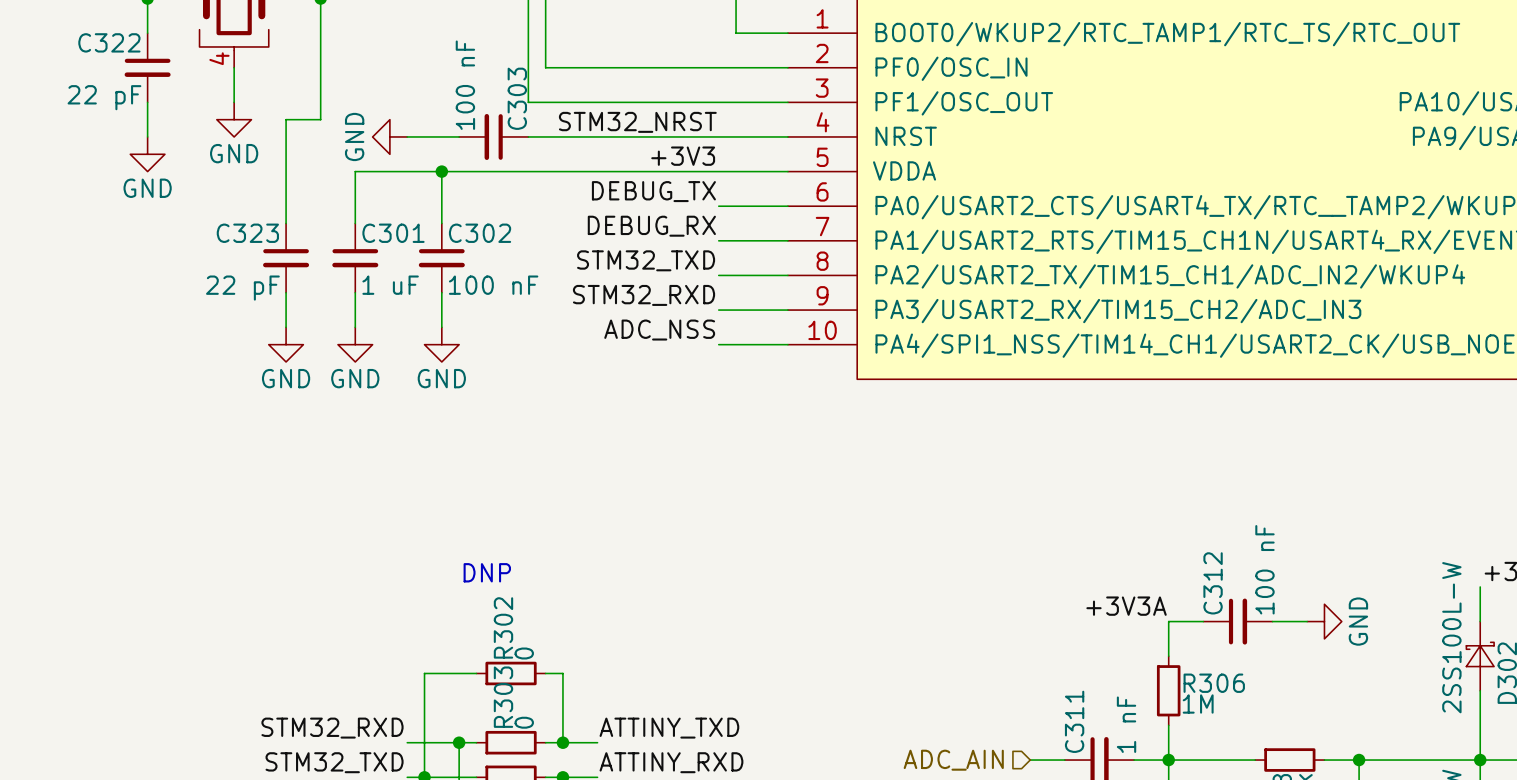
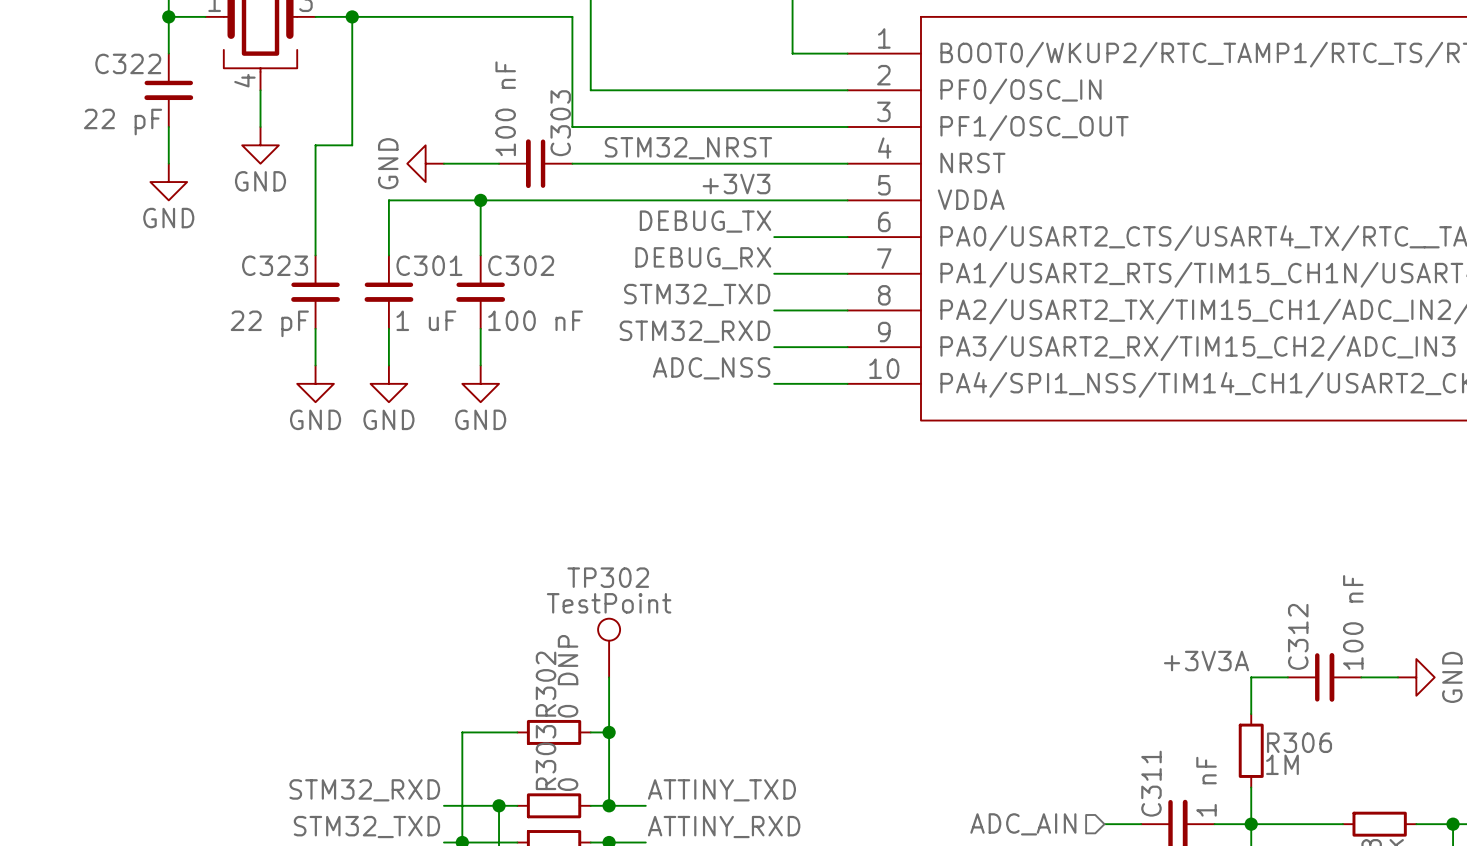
text: DNP (487, 572) -> none
TP302: none -> TestPoint (609, 648)
wire: none -> (609, 677) (609, 732)
R302 value: 0 (524, 653) -> 0 DNP (568, 676)
junction: none -> (609, 732)

